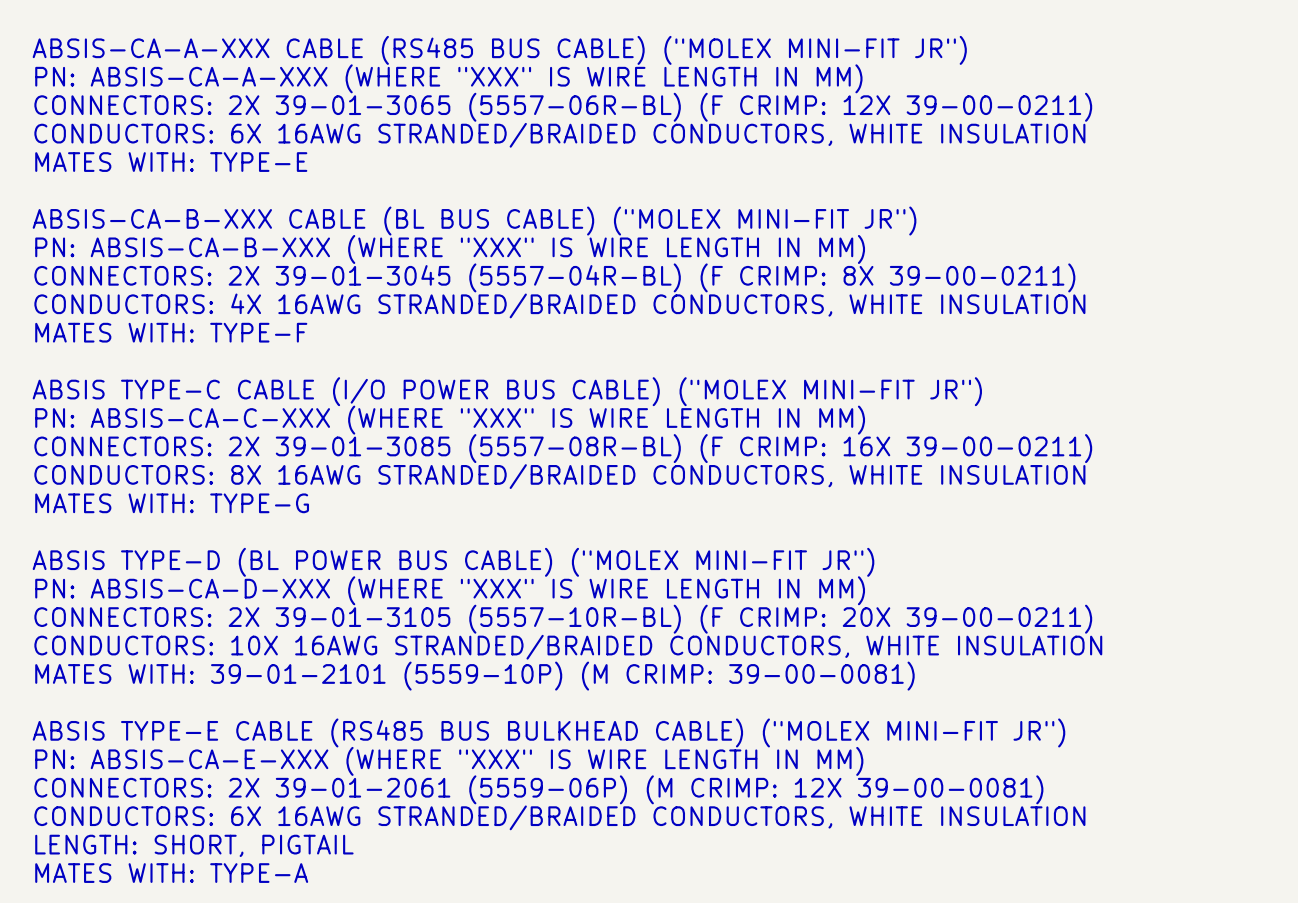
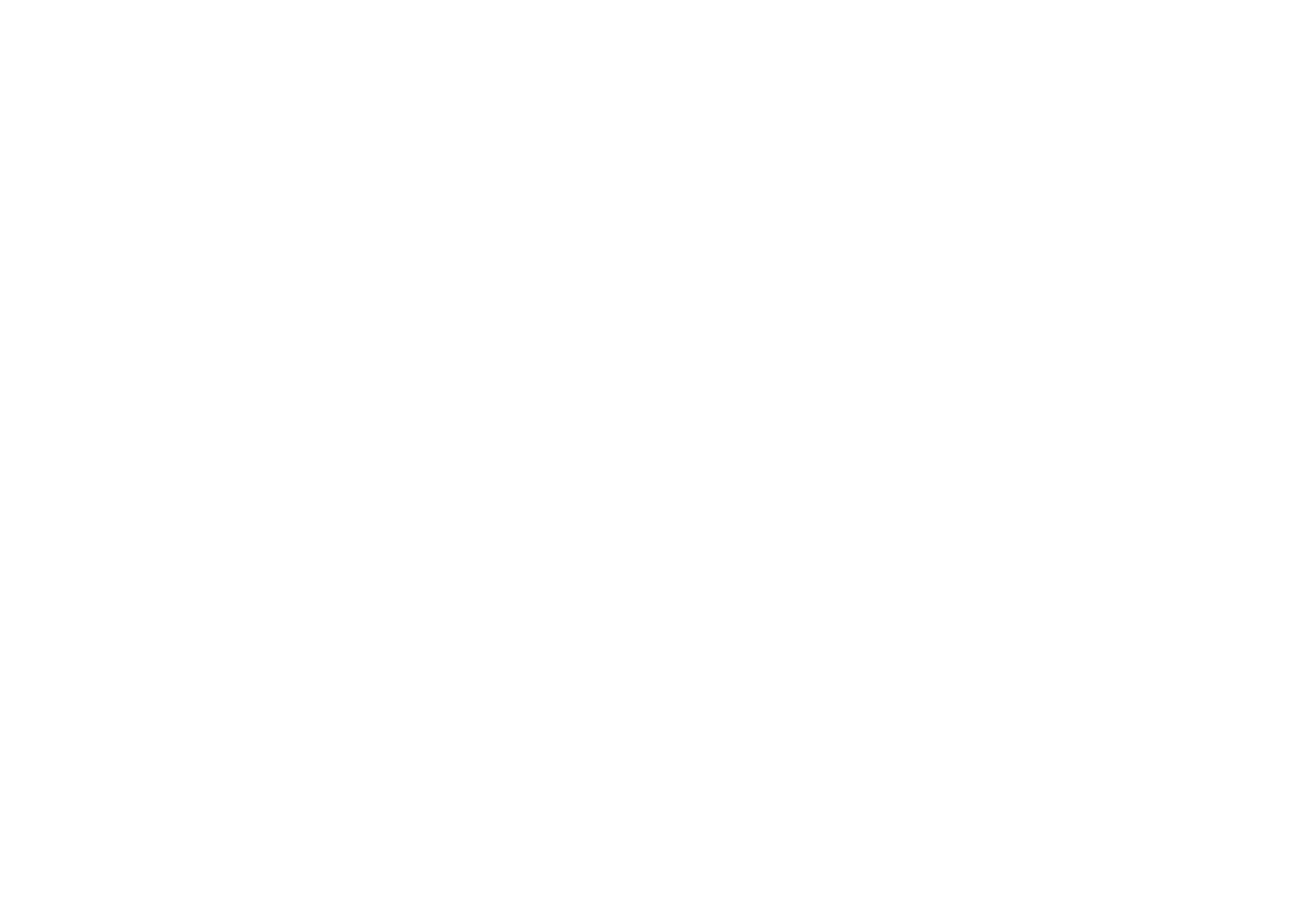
text: ABSIS-CA-A-XXX CABLE (RS485 BUS CABLE) ("MOLEX MINI-FIT JR") (499, 50) -> none
text: PN: ABSIS-CA-A-XXX (WHERE "XXX" IS WIRE LENGTH IN MM) (448, 78) -> none
text: CONNECTORS: 2X 39-01-3065 (5557-06R-BL) (F CRIMP: 12X 39-00-0211) (563, 107) -> none
text: CONDUCTORS: 6X 16AWG STRANDED/BRAIDED CONDUCTORS, WHITE INSULATION (559, 135) -> none
text: MATES WITH: TYPE-E (171, 162) -> none
text: ABSIS-CA-B-XXX CABLE (BL BUS CABLE) ("MOLEX MINI-FIT JR") (474, 221) -> none
text: PN: ABSIS-CA-B-XXX (WHERE "XXX" IS WIRE LENGTH IN MM) (450, 249) -> none
text: CONNECTORS: 2X 39-01-3045 (5557-04R-BL) (F CRIMP: 8X 39-00-0211) (554, 277) -> none
text: CONDUCTORS: 4X 16AWG STRANDED/BRAIDED CONDUCTORS, WHITE INSULATION (559, 305) -> none
text: MATES WITH: TYPE-F (171, 332) -> none
text: ABSIS TYPE-C CABLE (I/O POWER BUS CABLE) ("MOLEX MINI-FIT JR") (507, 391) -> none
text: PN: ABSIS-CA-C-XXX (WHERE "XXX" IS WIRE LENGTH IN MM) (450, 420) -> none
text: CONNECTORS: 2X 39-01-3085 (5557-08R-BL) (F CRIMP: 16X 39-00-0211) (563, 448) -> none
text: CONDUCTORS: 8X 16AWG STRANDED/BRAIDED CONDUCTORS, WHITE INSULATION (559, 476) -> none
text: MATES WITH: TYPE-G (172, 503) -> none
text: ABSIS TYPE-D (BL POWER BUS CABLE) ("MOLEX MINI-FIT JR") (453, 562) -> none
text: PN: ABSIS-CA-D-XXX (WHERE "XXX" IS WIRE LENGTH IN MM) (450, 590) -> none
text: CONNECTORS: 2X 39-01-3105 (5557-10R-BL) (F CRIMP: 20X 39-00-0211) (563, 619) -> none
text: CONDUCTORS: 10X 16AWG STRANDED/BRAIDED CONDUCTORS, WHITE INSULATION (568, 647) -> none
text: MATES WITH: 39-01-2101 (5559-10P) (M CRIMP: 39-00-0081) (474, 676) -> none
text: ABSIS TYPE-E CABLE (RS485 BUS BULKHEAD CABLE) ("MOLEX MINI-FIT JR") (548, 732) -> none
text: PN: ABSIS-CA-E-XXX (WHERE "XXX" IS WIRE LENGTH IN MM) (449, 761) -> none
text: CONNECTORS: 2X 39-01-2061 (5559-06P) (M CRIMP: 12X 39-00-0081) (538, 789) -> none
text: CONDUCTORS: 6X 16AWG STRANDED/BRAIDED CONDUCTORS, WHITE INSULATION (559, 817) -> none
text: LENGTH: SHORT, PIGTAIL (194, 845) -> none
text: MATES WITH: TYPE-A (171, 873) -> none

